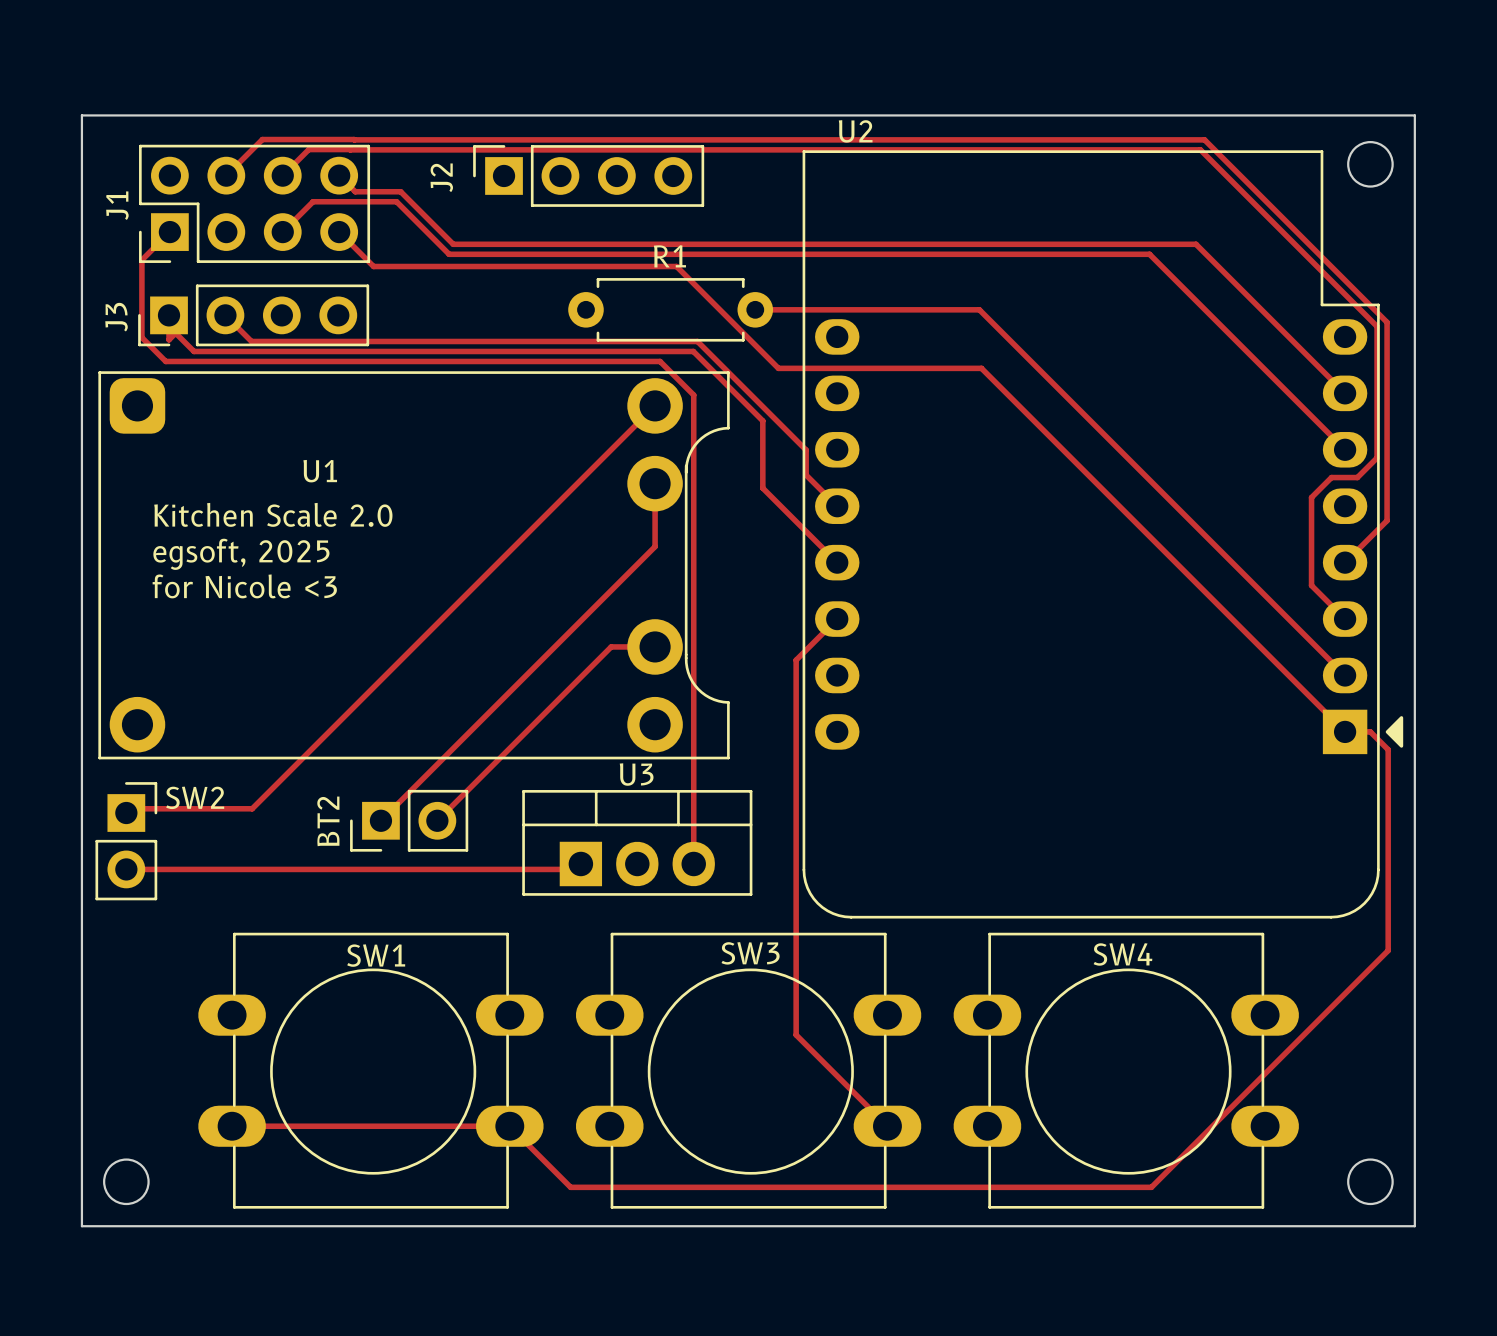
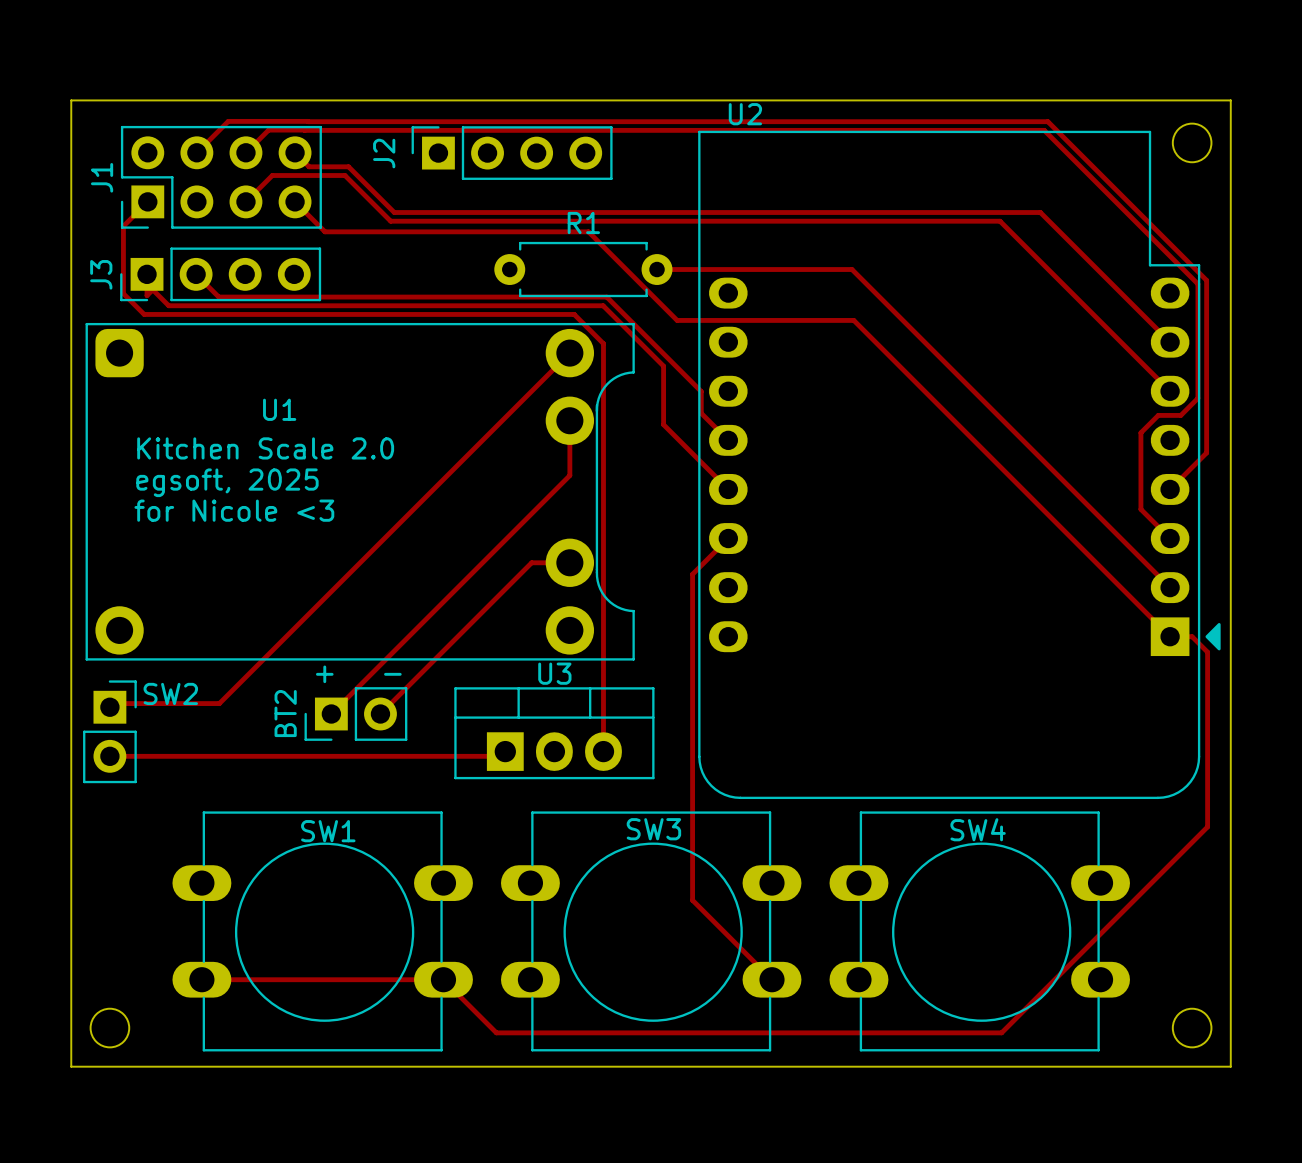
text: none -> + - (358, 674)

